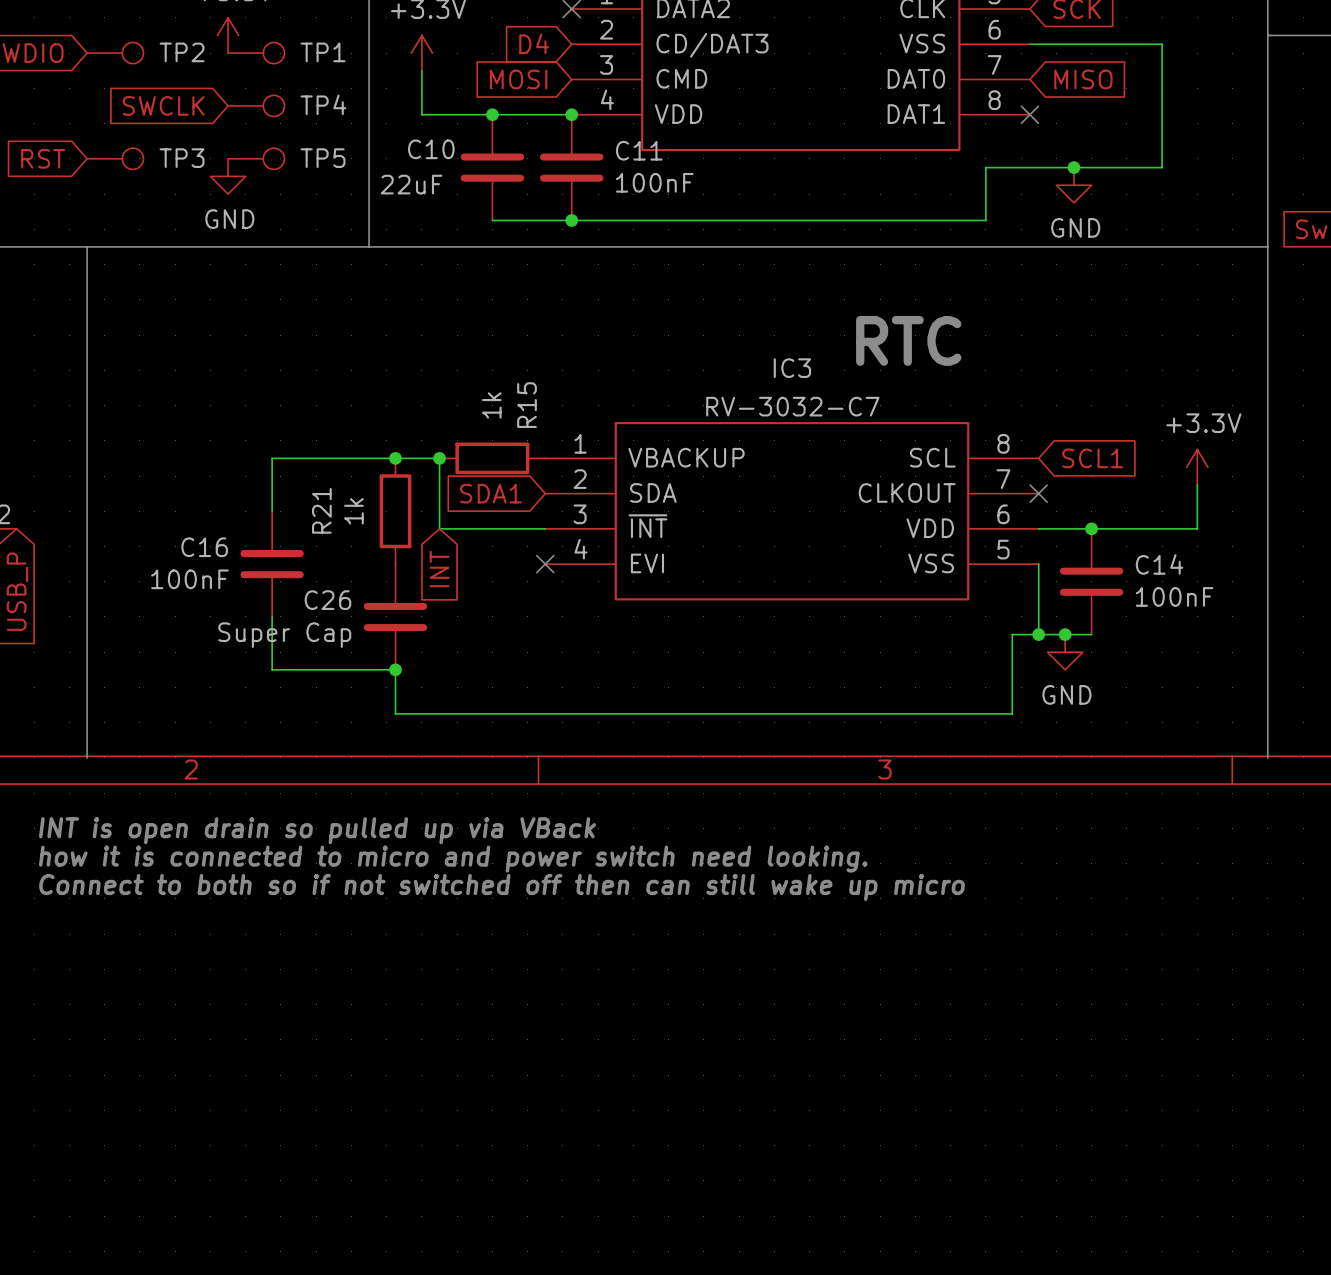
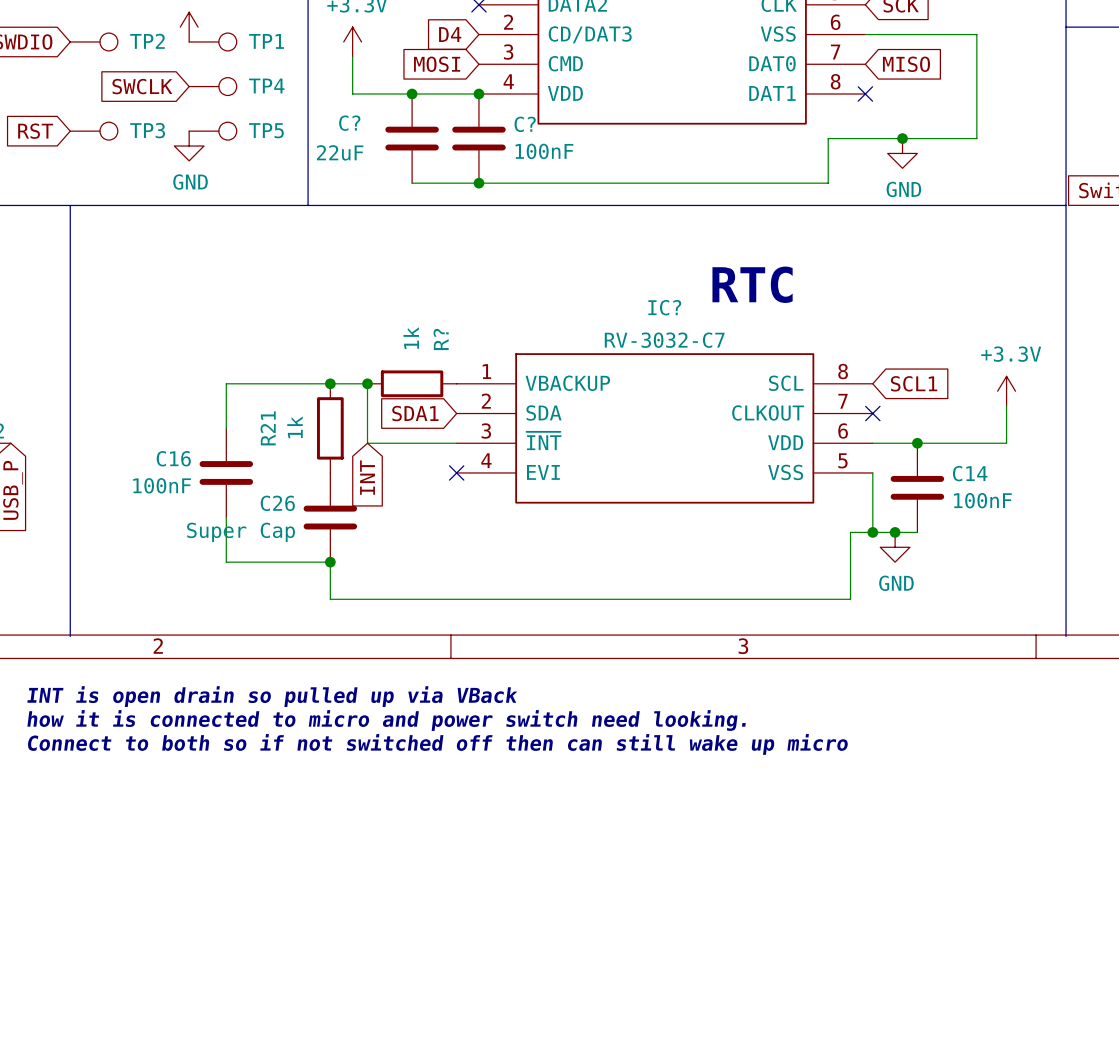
C10 name: C10 (431, 149) -> C? (349, 123)
C11 name: C11 (639, 150) -> C? (525, 124)
IC3 name: IC3 (792, 368) -> IC? (664, 307)
R15 name: R15 (527, 405) -> R? (441, 339)

